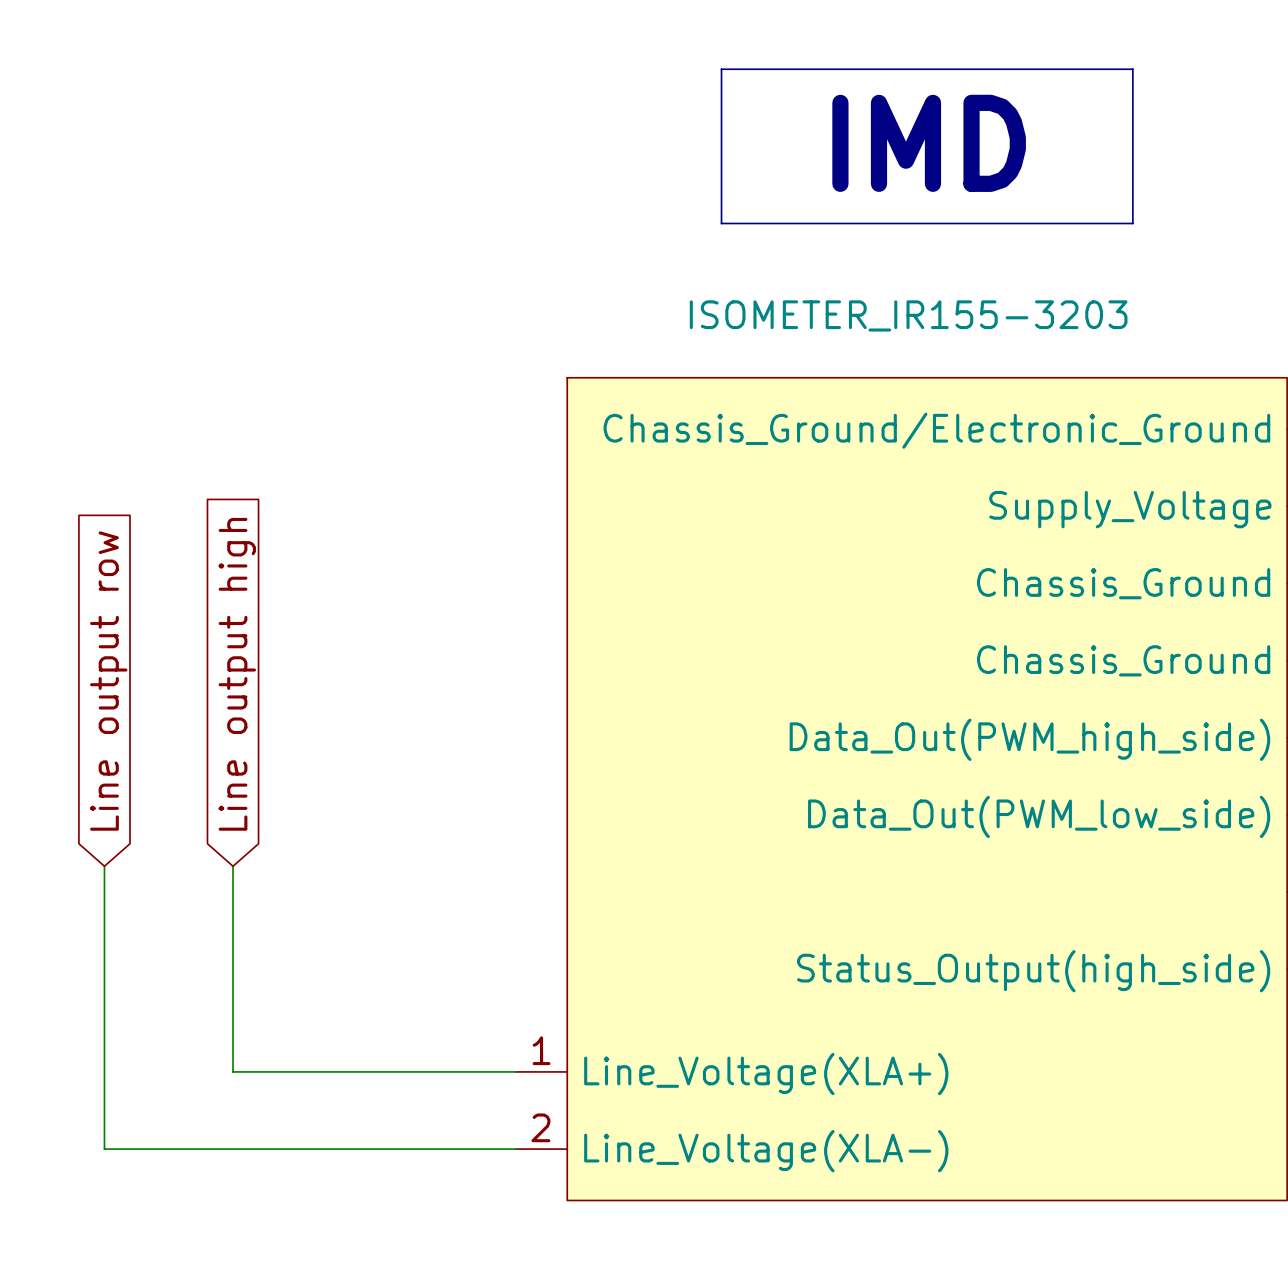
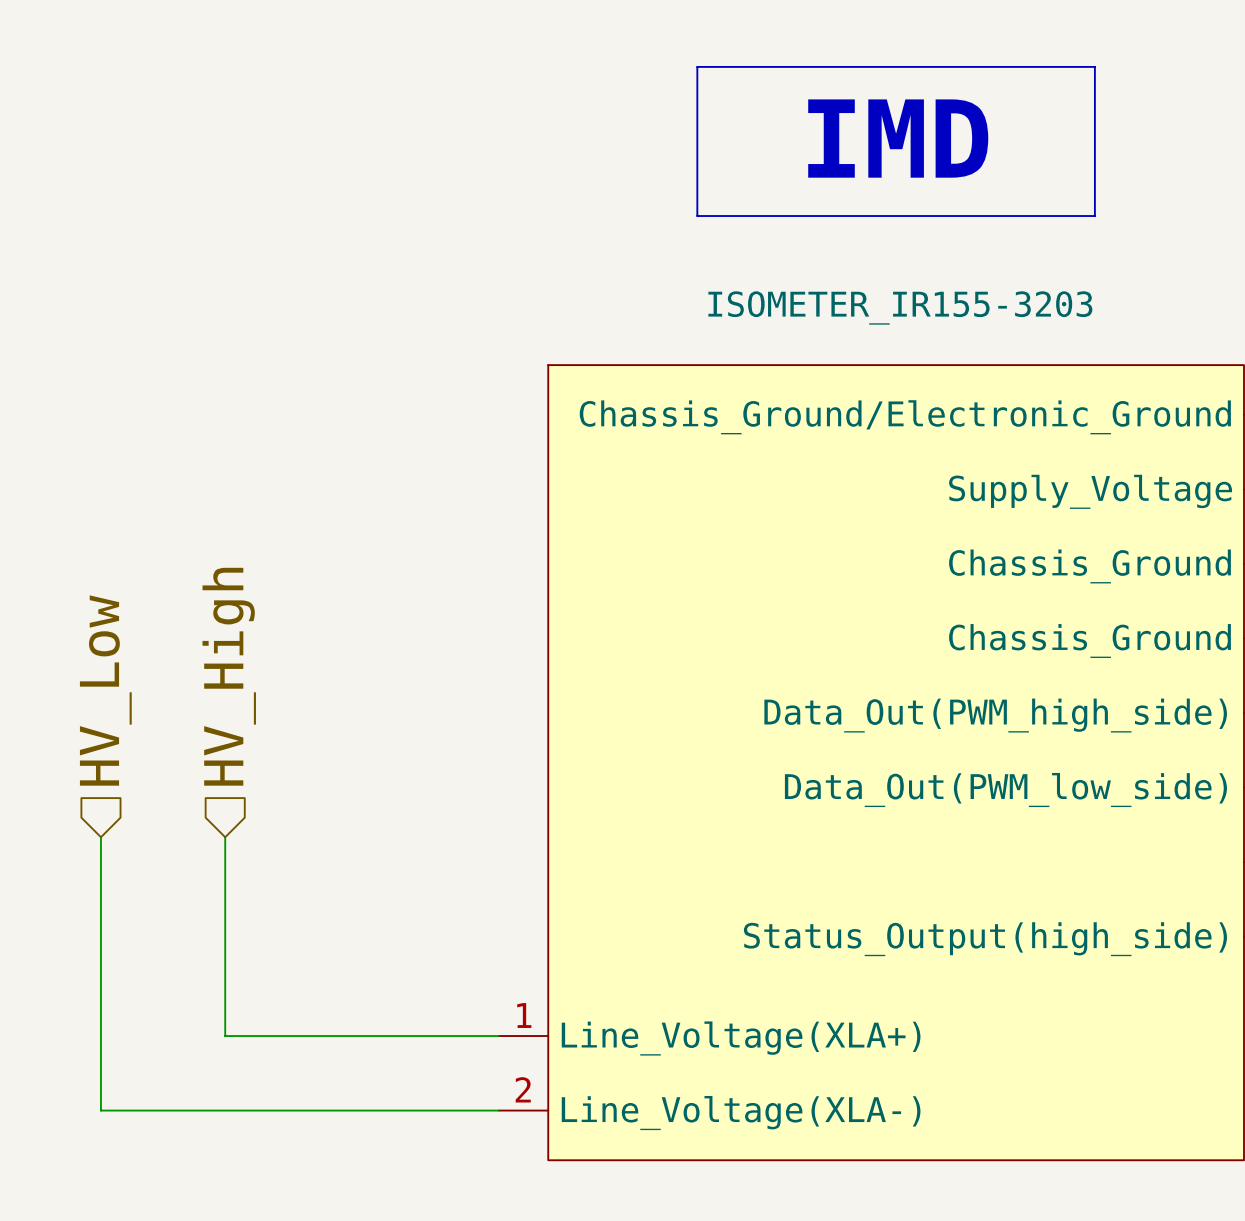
global label: Line output high (237, 674) -> none
global label: Line output row (108, 681) -> none
hierarchical label: none -> HV_High (229, 676)
hierarchical label: none -> HV_Low (105, 690)

